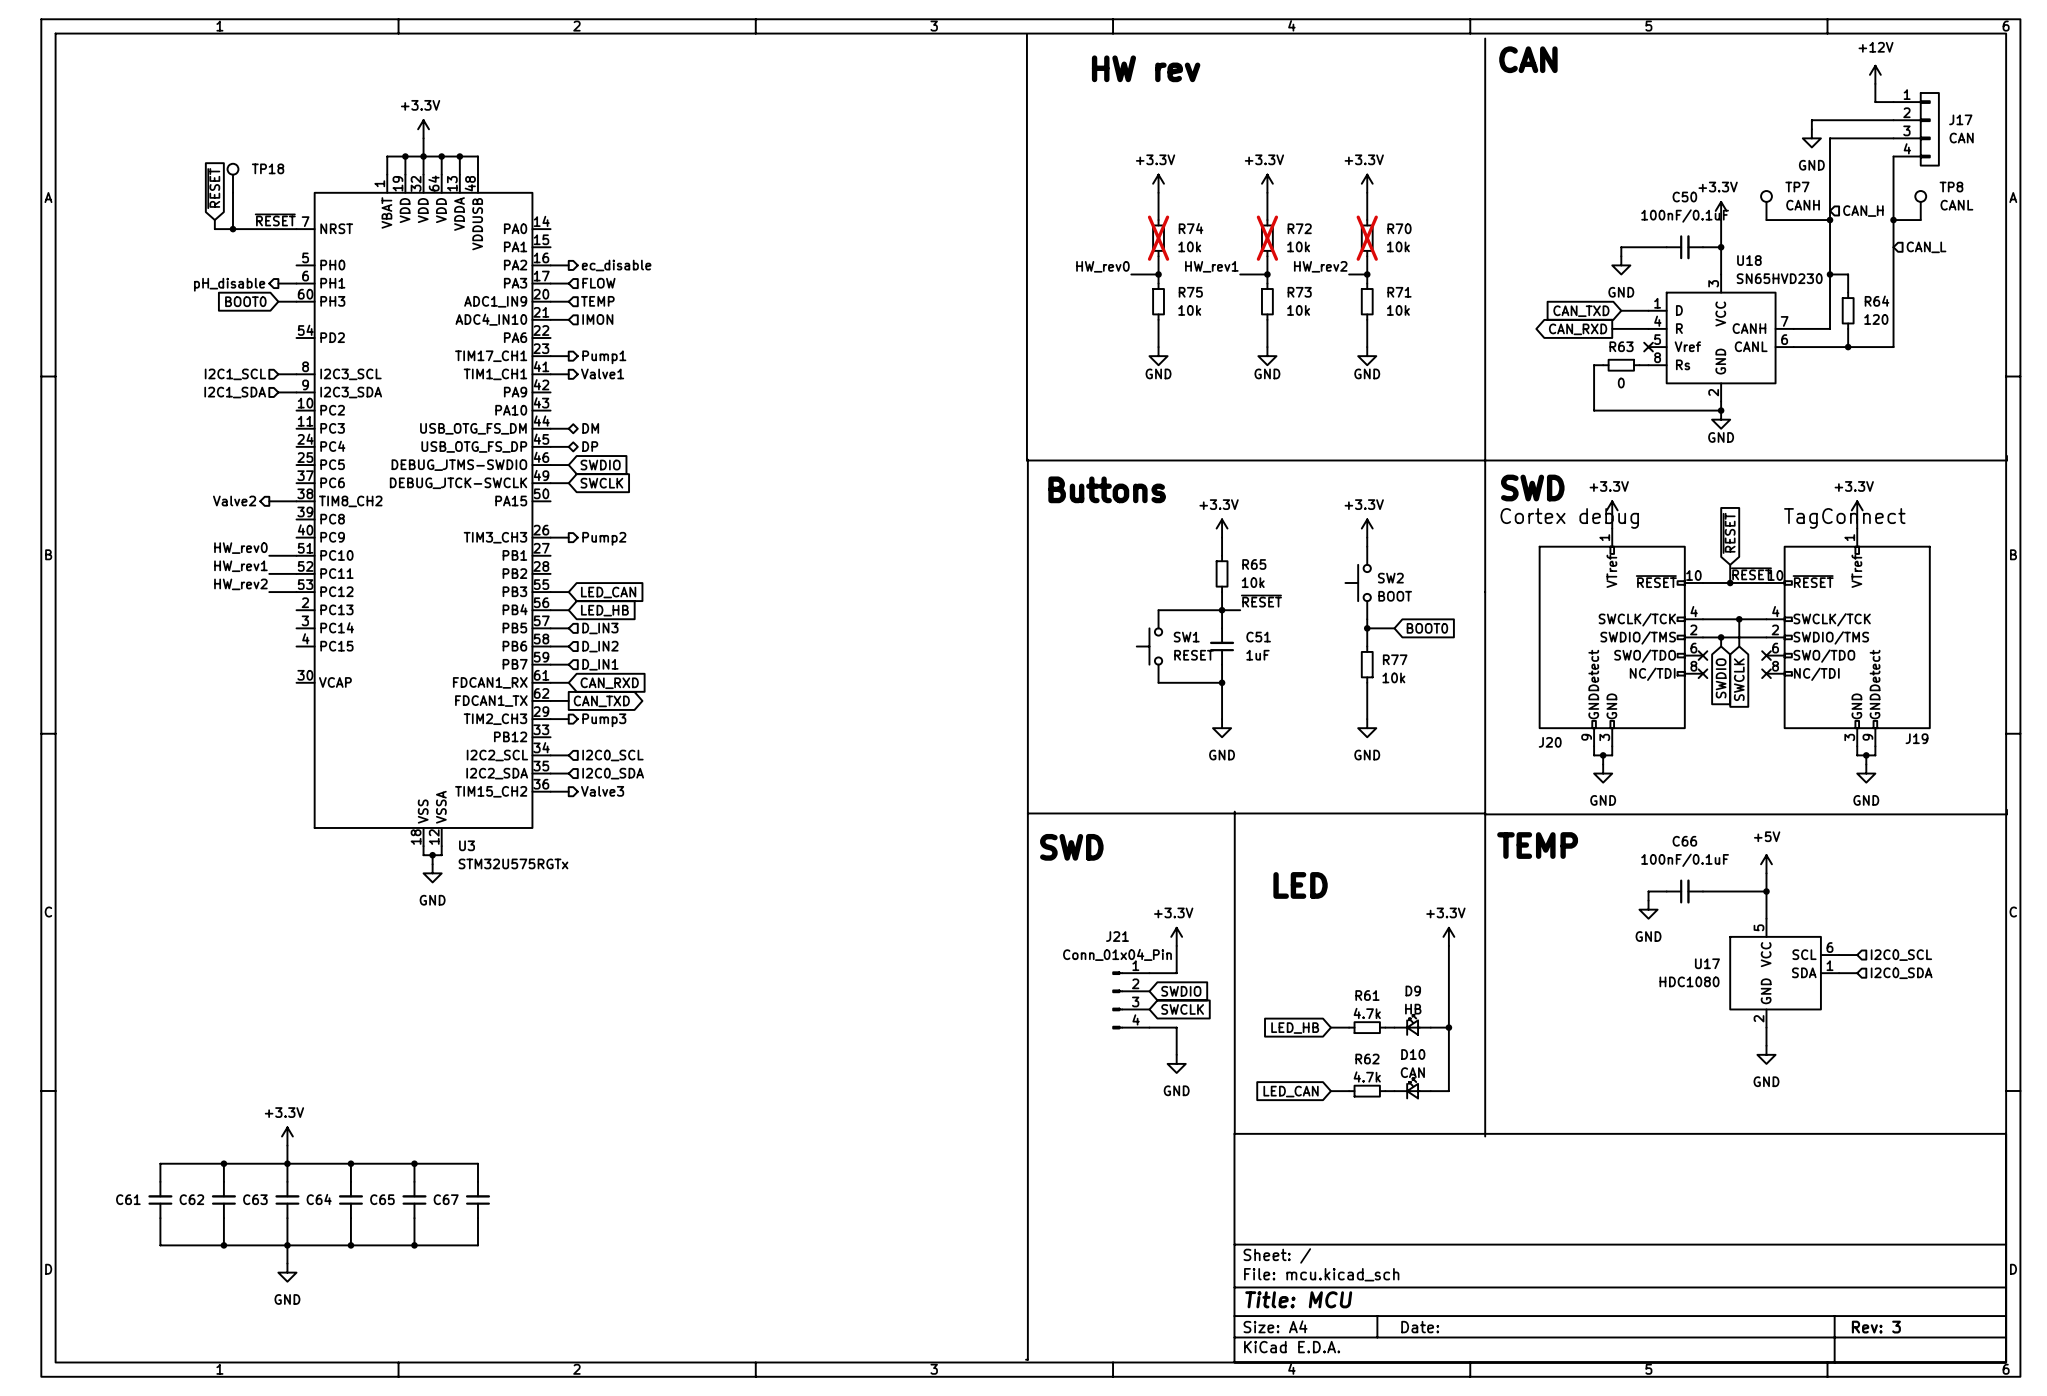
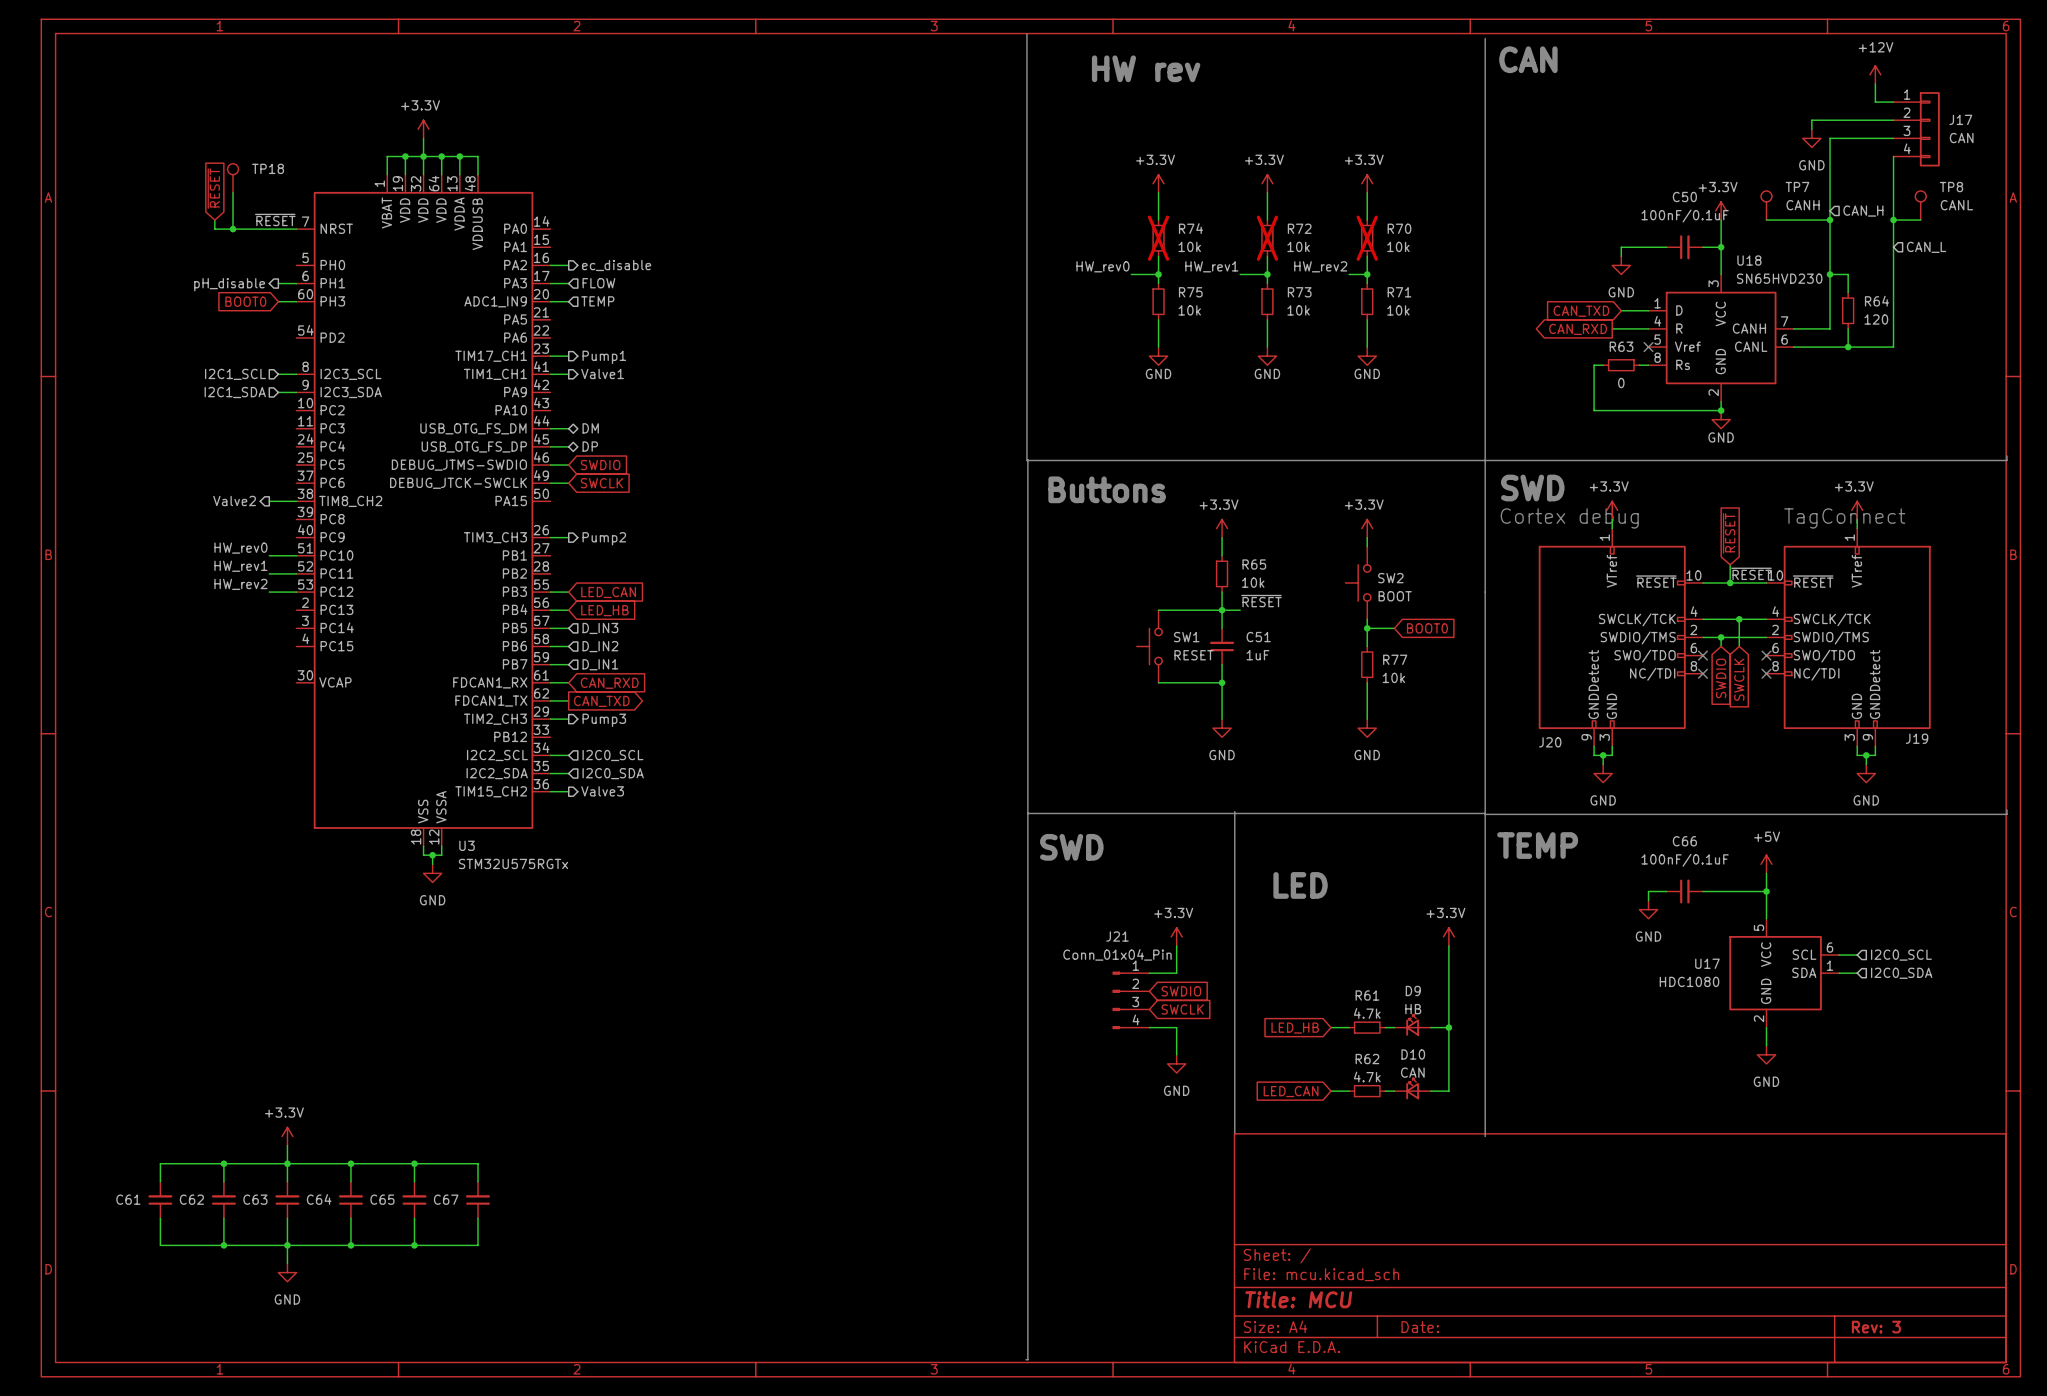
U3 pin name: ADC4_IN10 (491, 319) -> PA5 (515, 319)
wire: (550, 319) (568, 319) -> none
hierarchical label: IMON (597, 319) -> none

